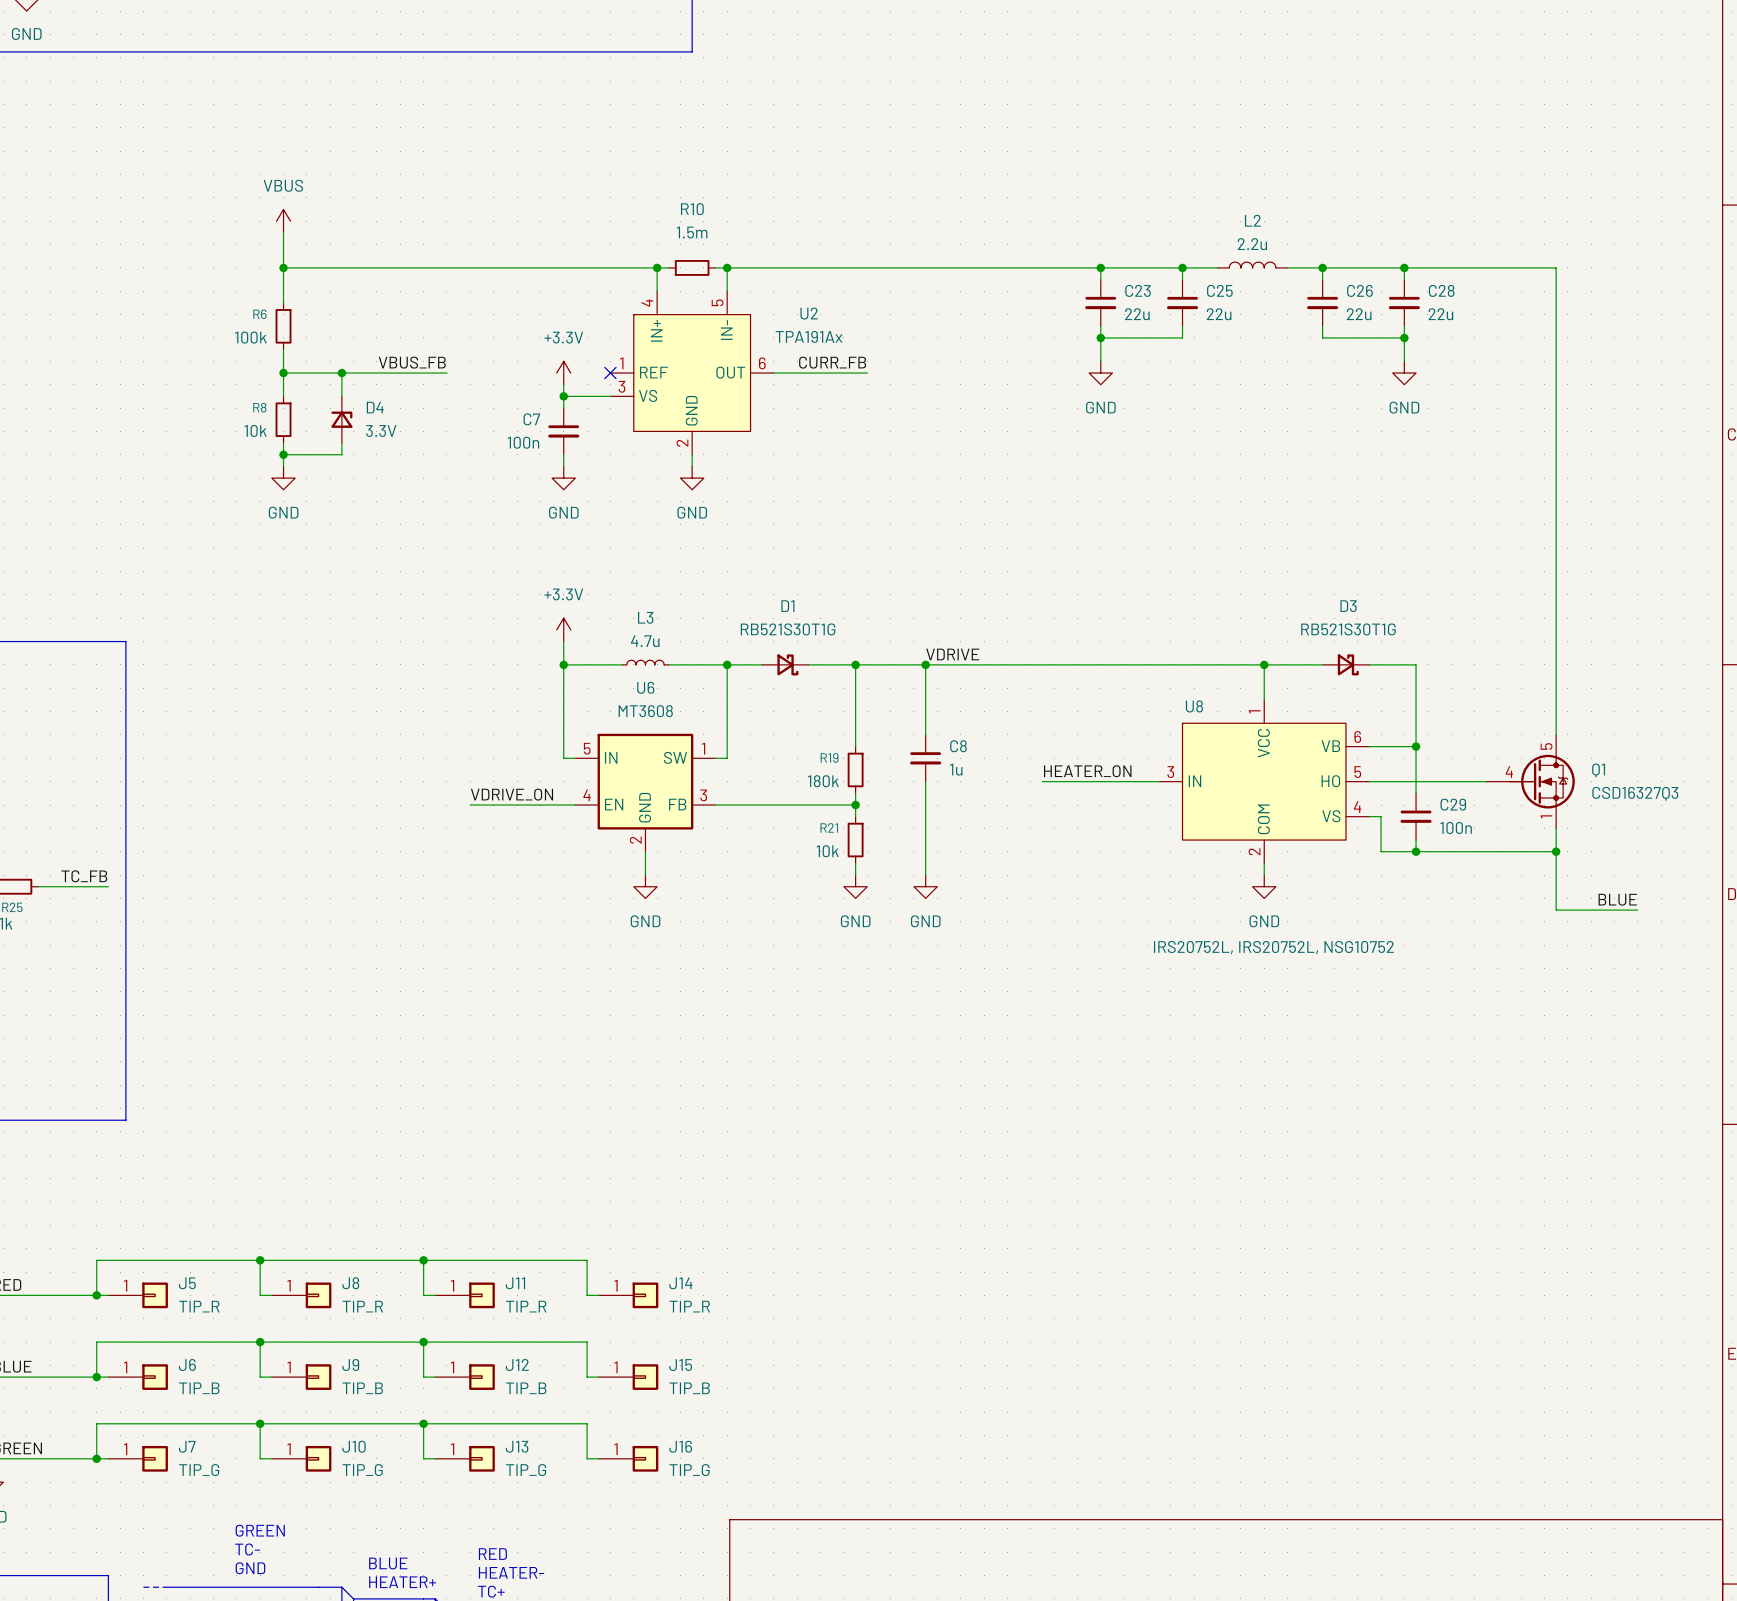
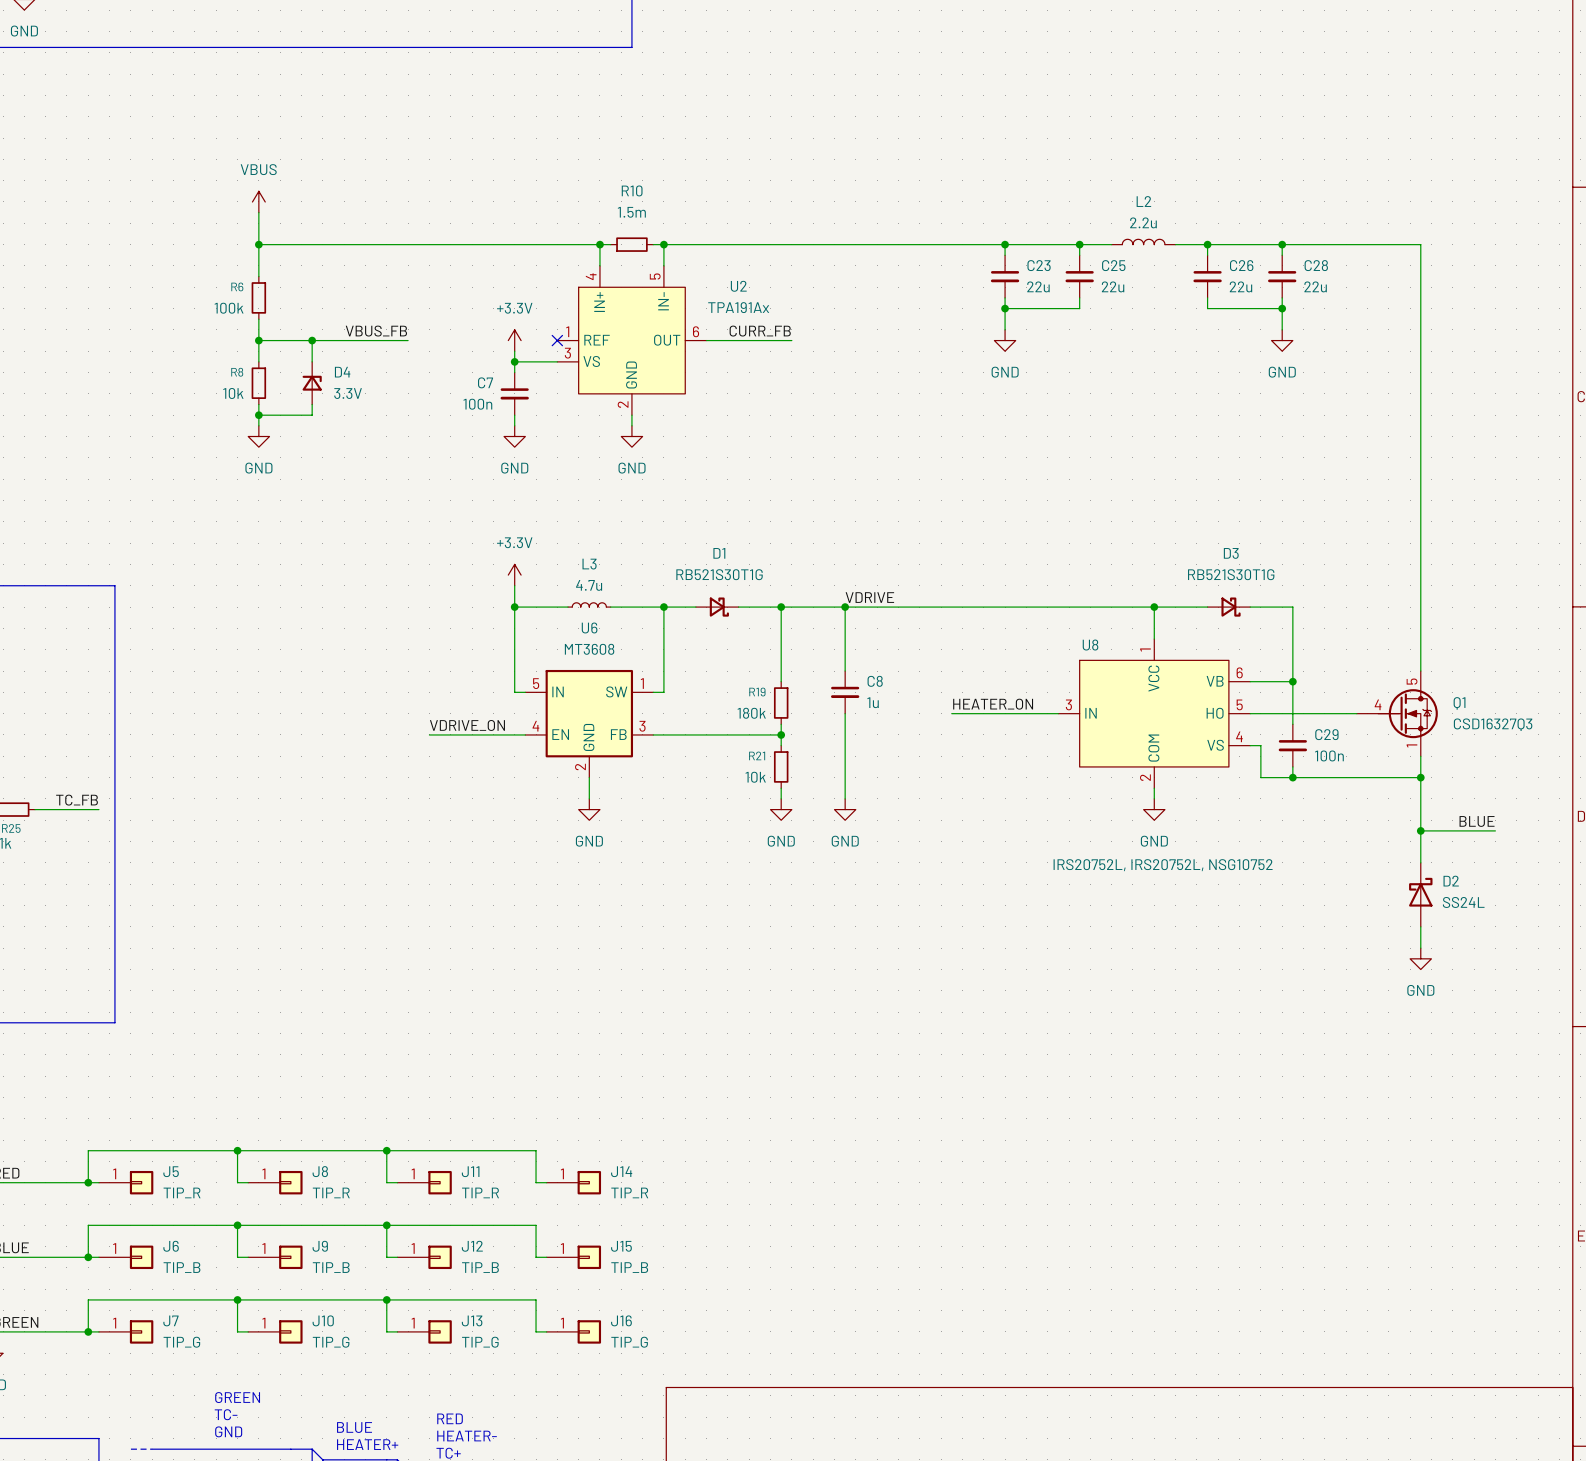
wire: none -> (1420, 830) (1420, 862)
junction: none -> (1420, 830)
D2: none -> SS24L (1420, 894)
wire: none -> (1420, 926) (1420, 948)
power symbol: none -> GND (1420, 958)

